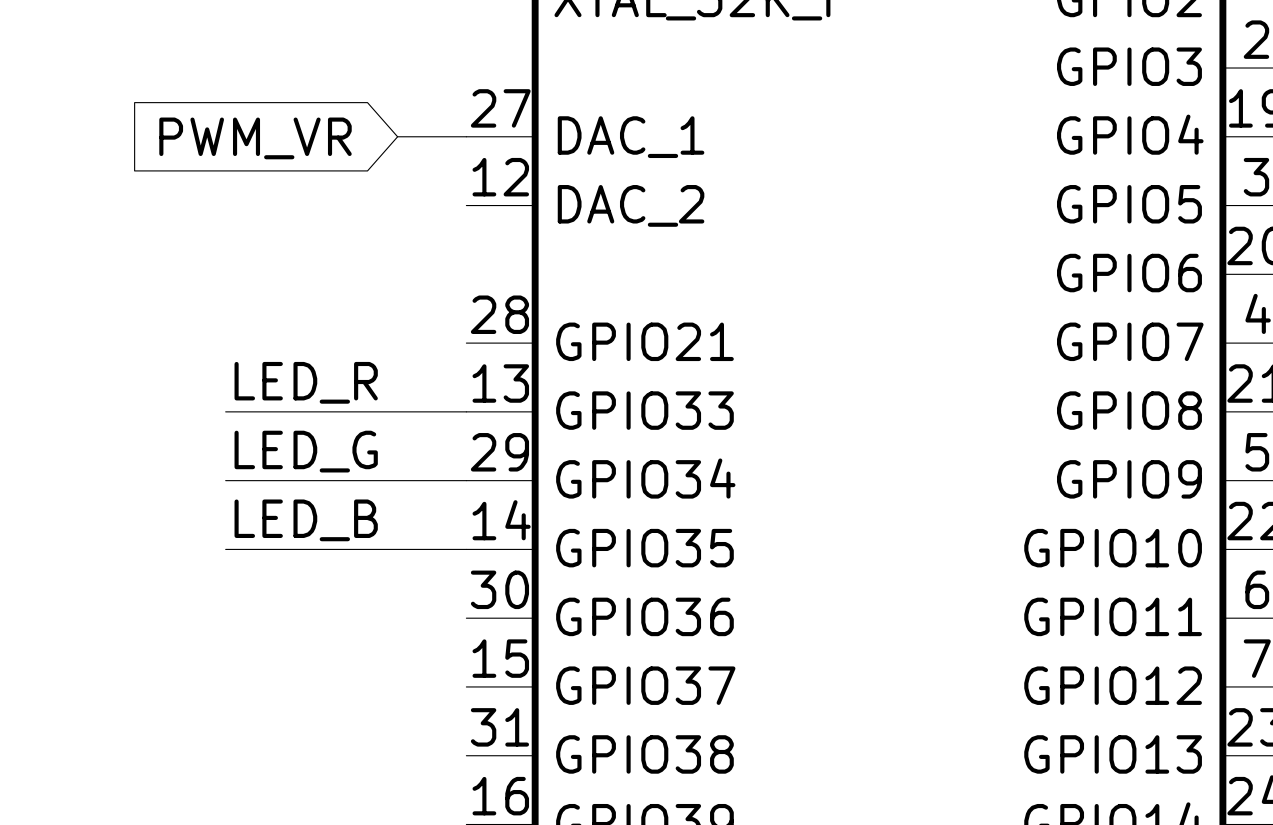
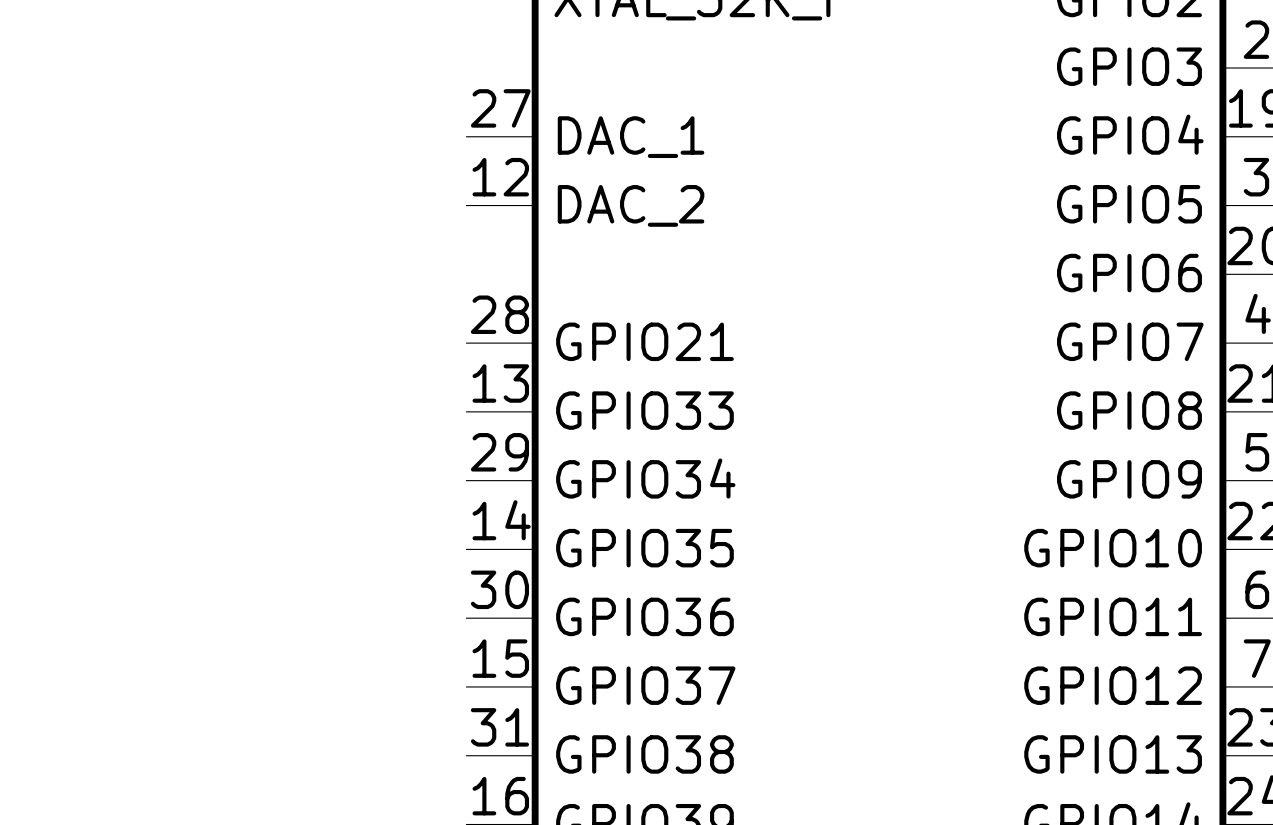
wire: (397, 136) (466, 136) -> none
global label: PWM_VR (255, 138) -> none
label: LED_R (306, 382) -> none
wire: (225, 411) (466, 411) -> none
label: LED_G (306, 451) -> none
wire: (225, 480) (466, 480) -> none
label: LED_B (306, 520) -> none
wire: (225, 549) (466, 549) -> none

